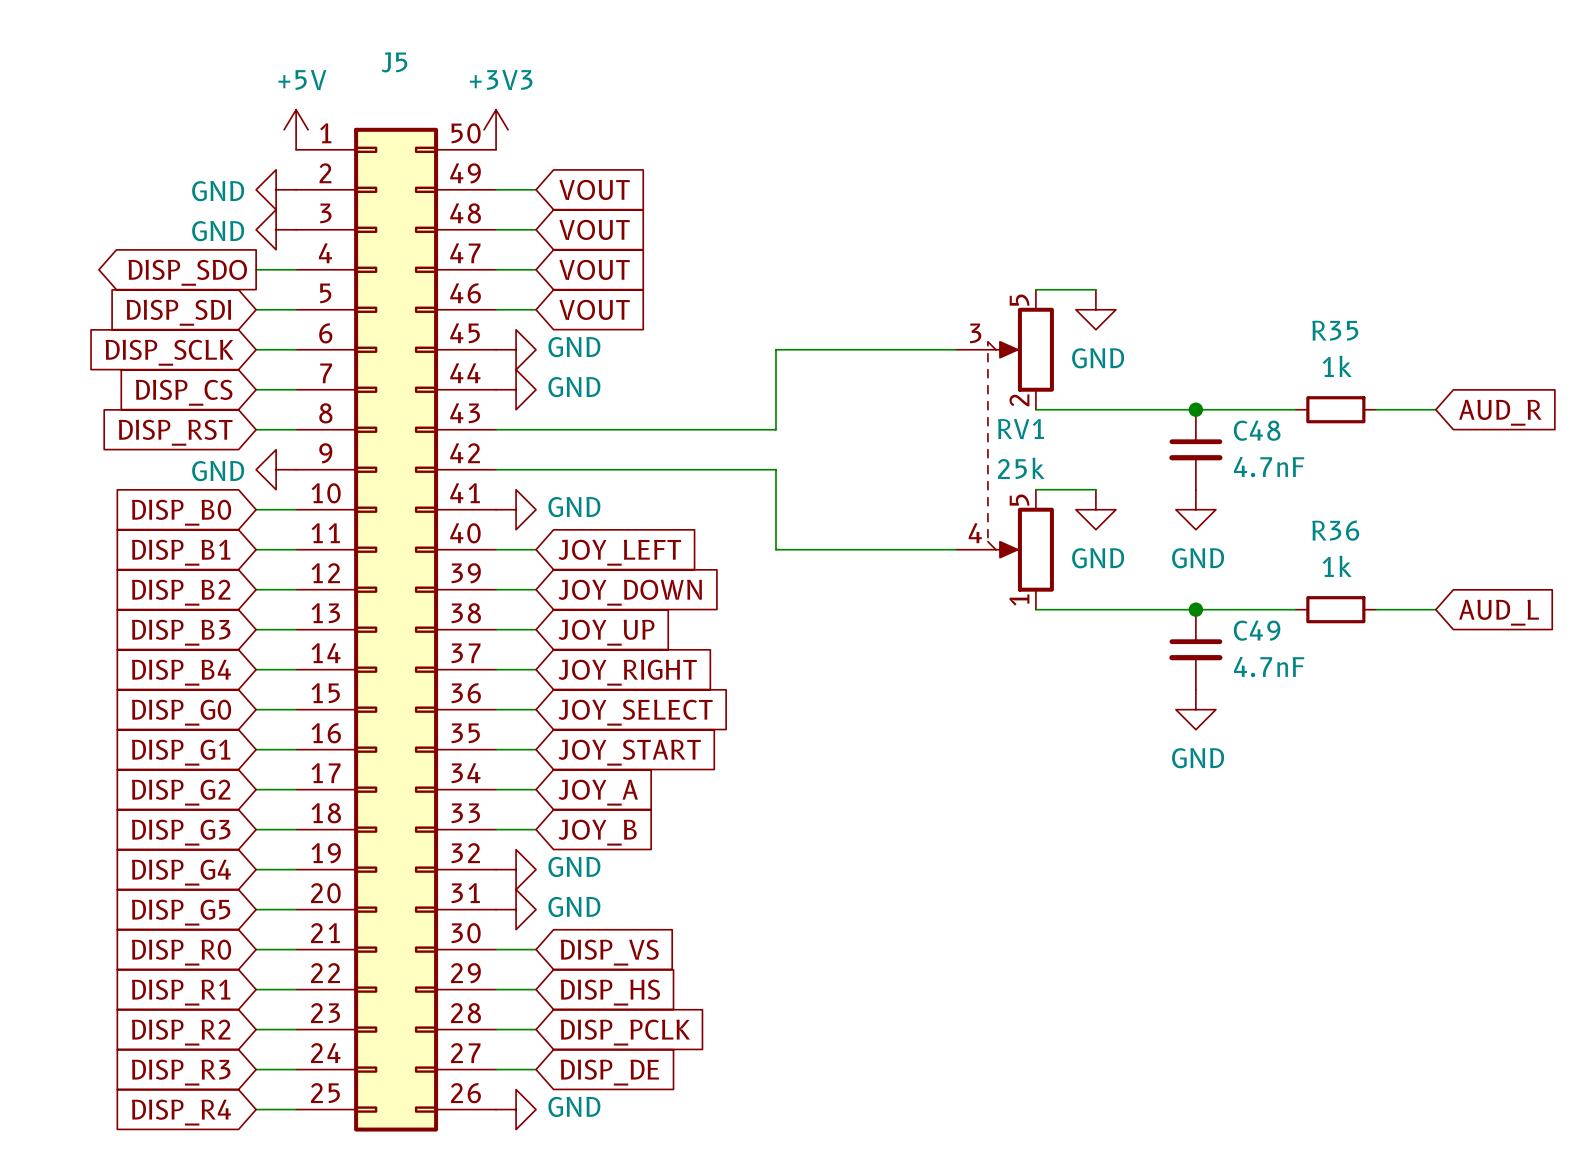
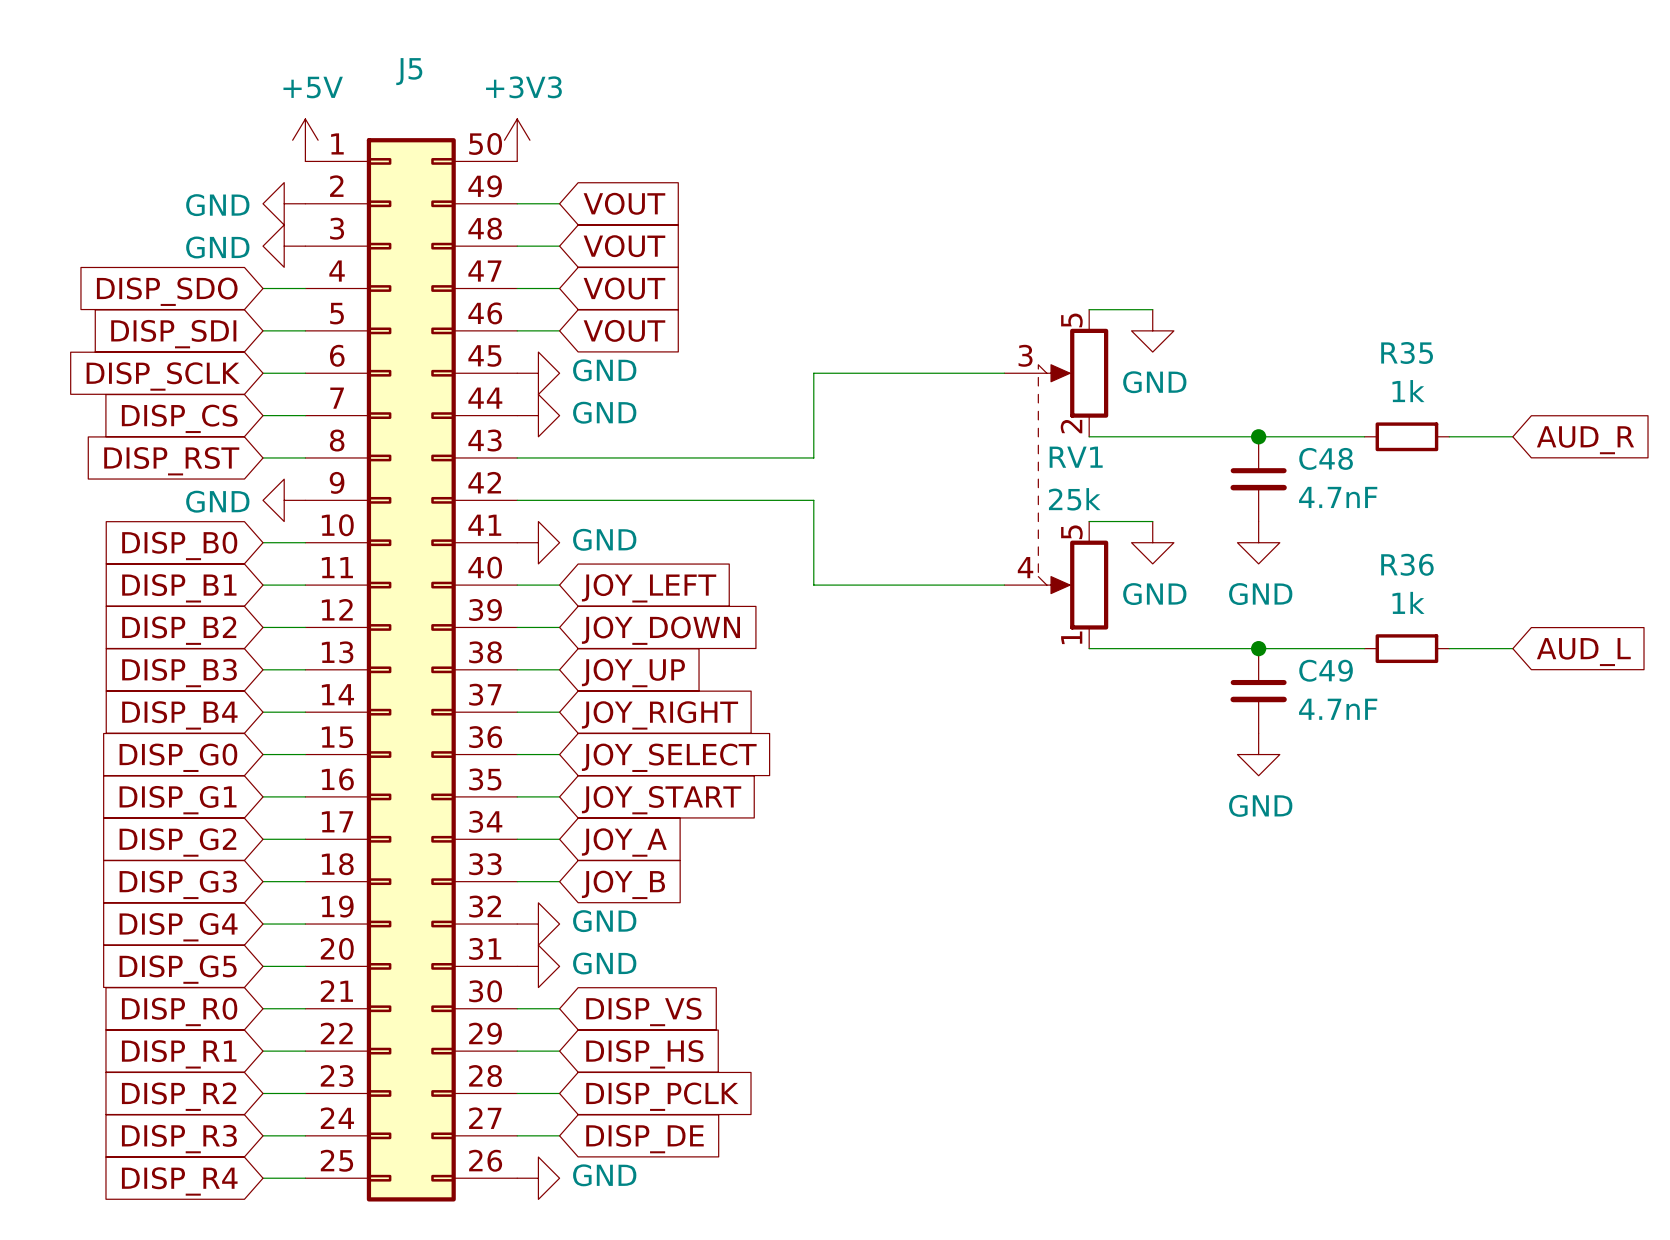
global label shape: output (187, 272) -> input (167, 291)

